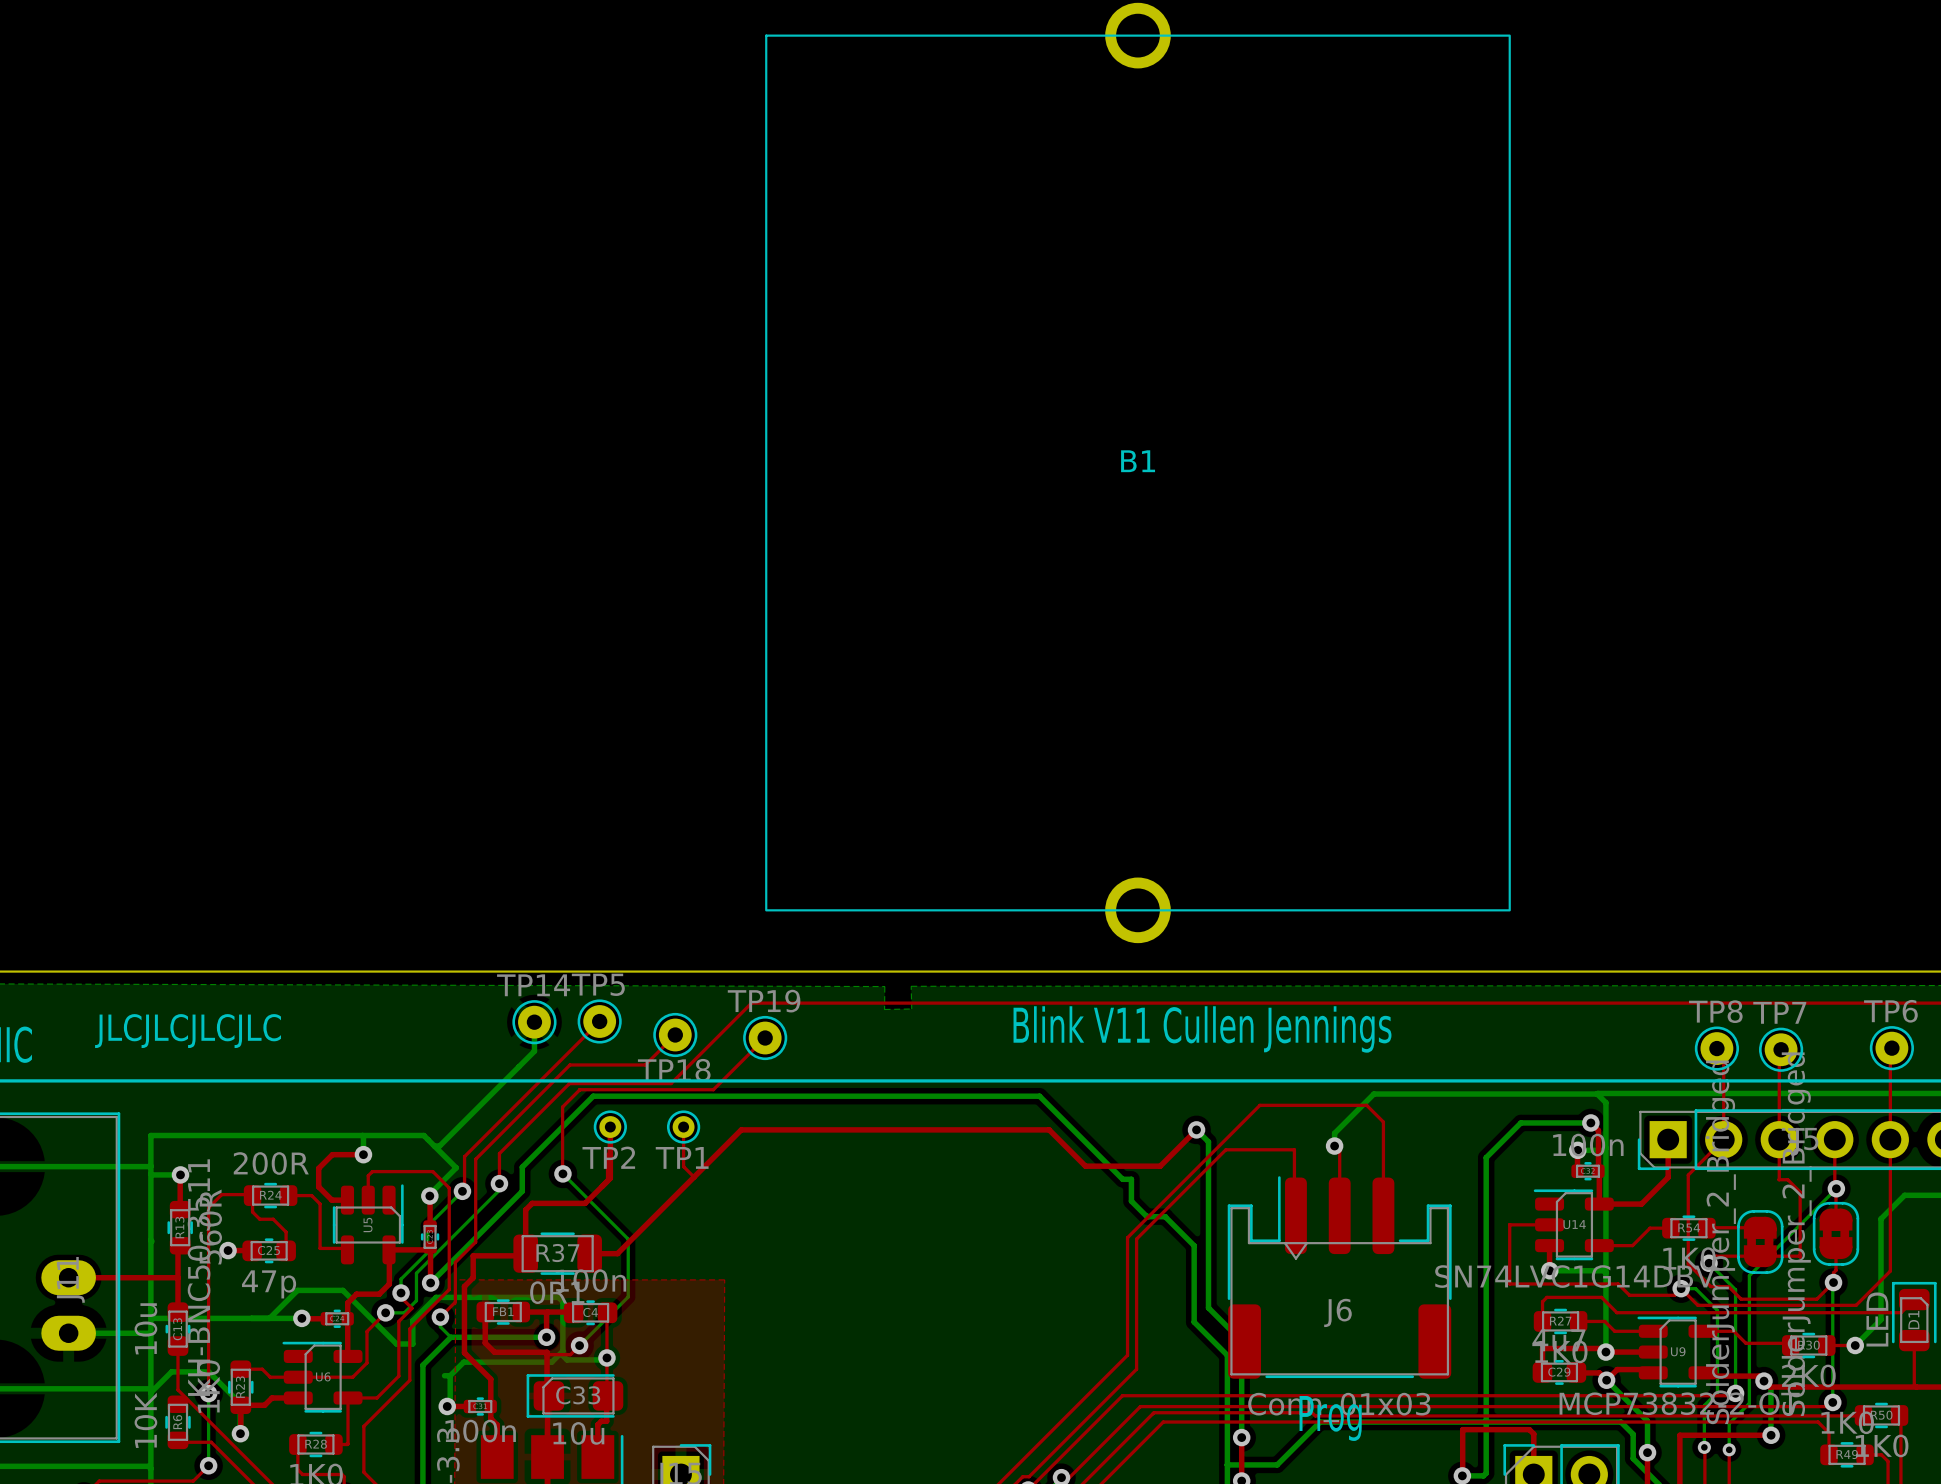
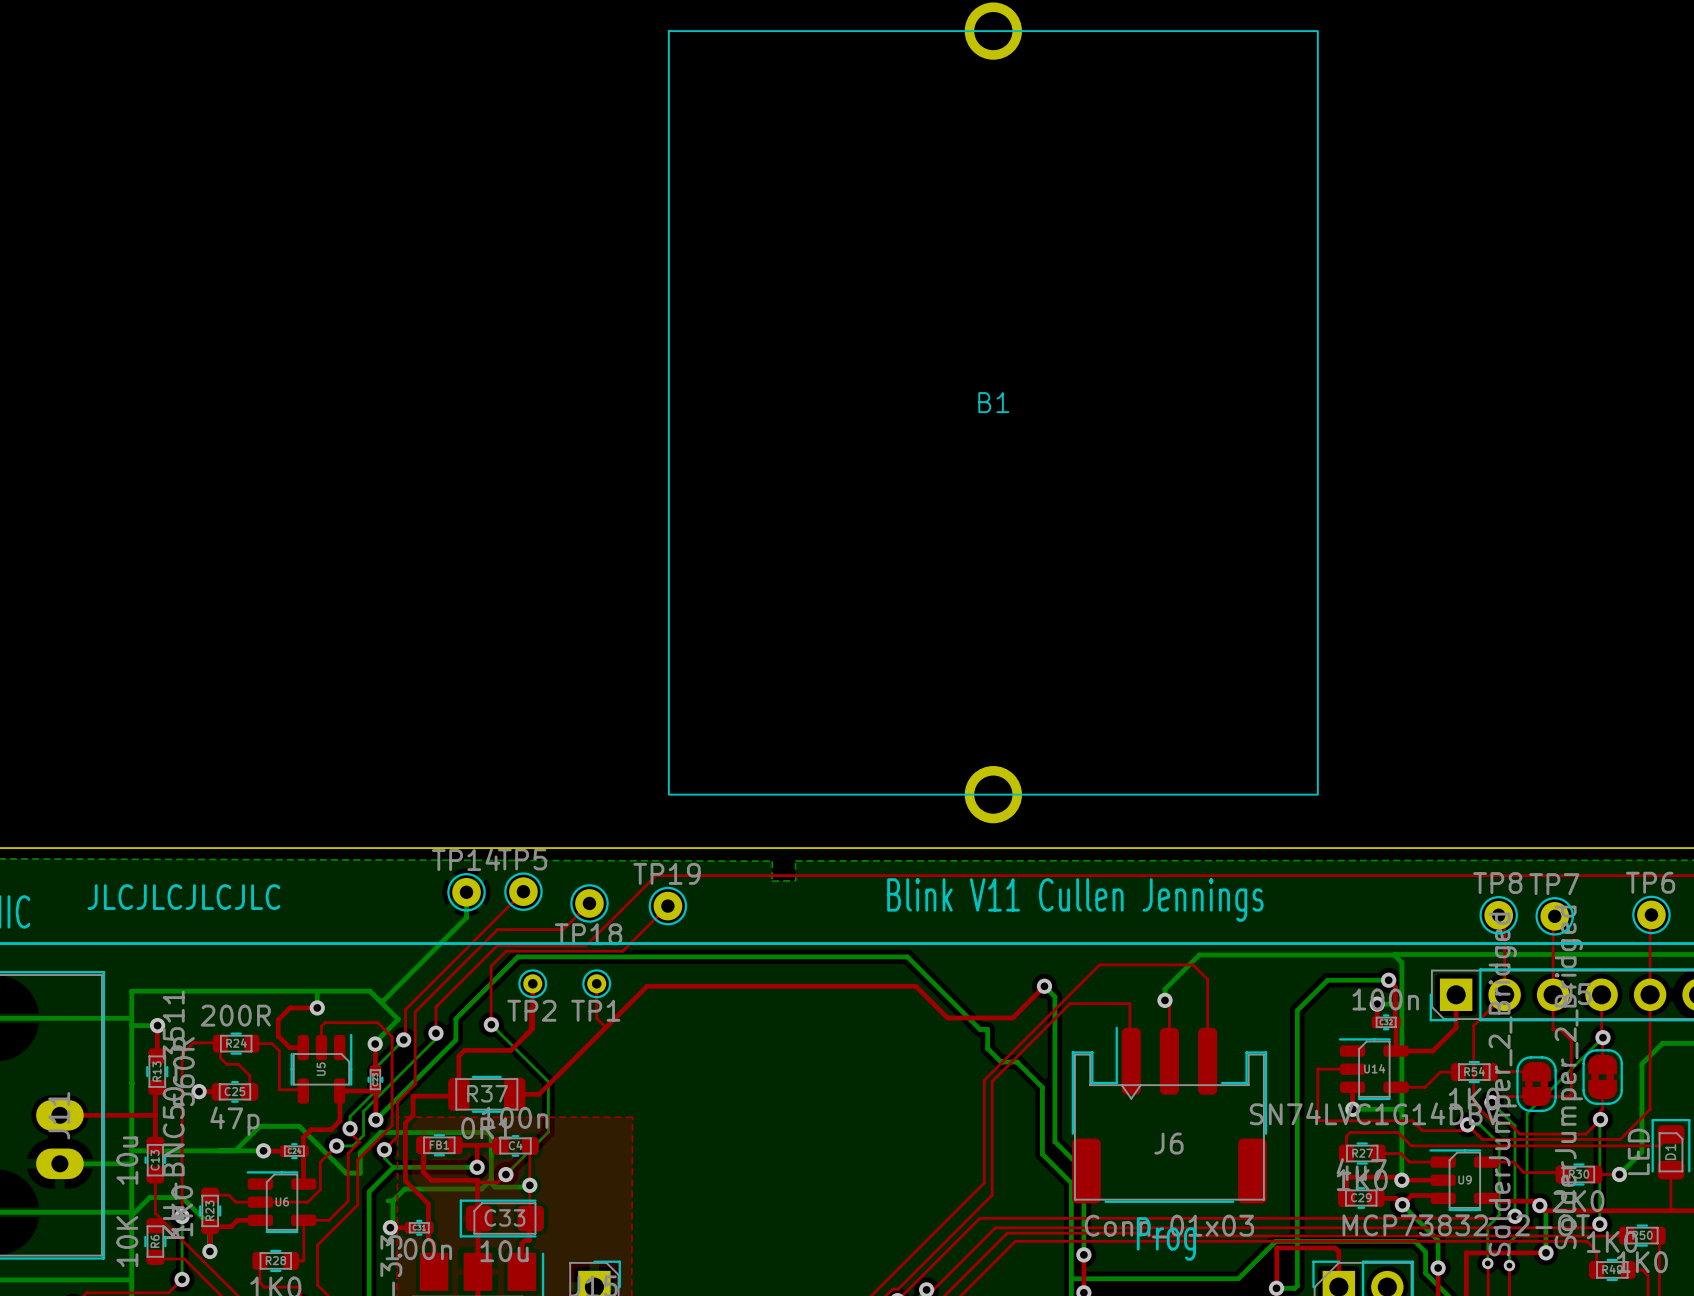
bottom track: (1461, 1422) (1320, 1422) (1277, 1464) -> (1275, 1241) (1238, 1278) (1114, 1278)

